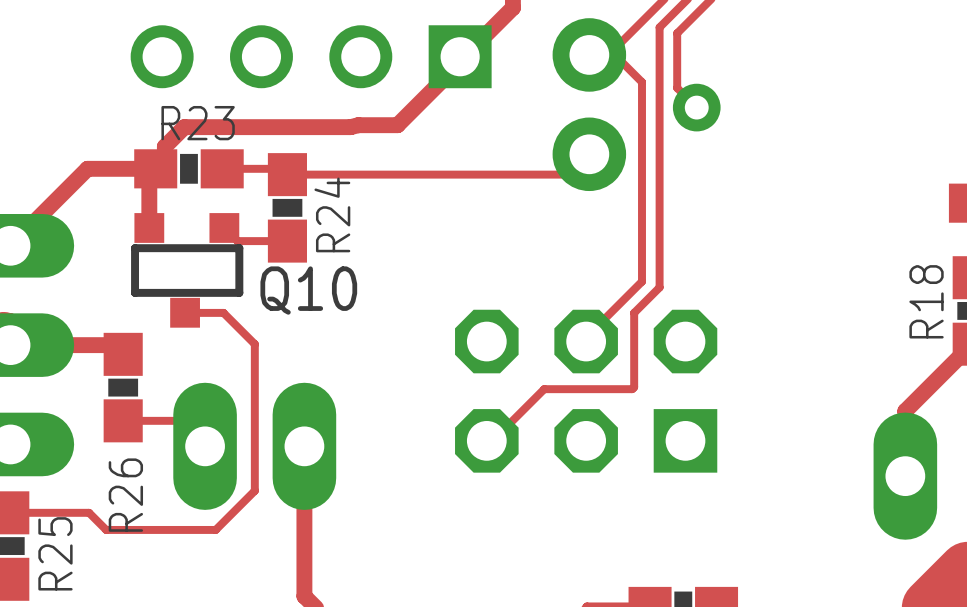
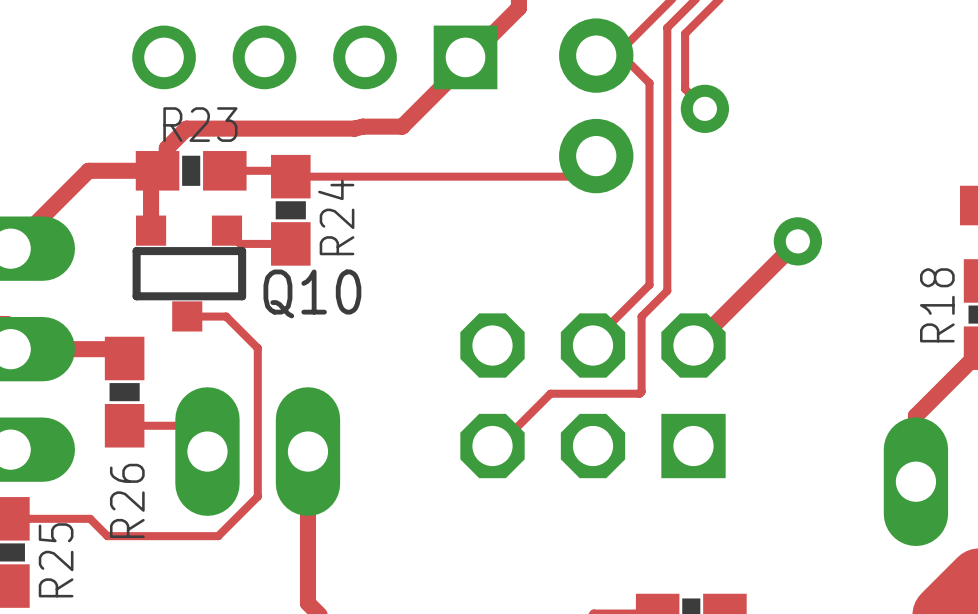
track: none -> (797, 241) (693, 345)
via: none -> (797, 241)

